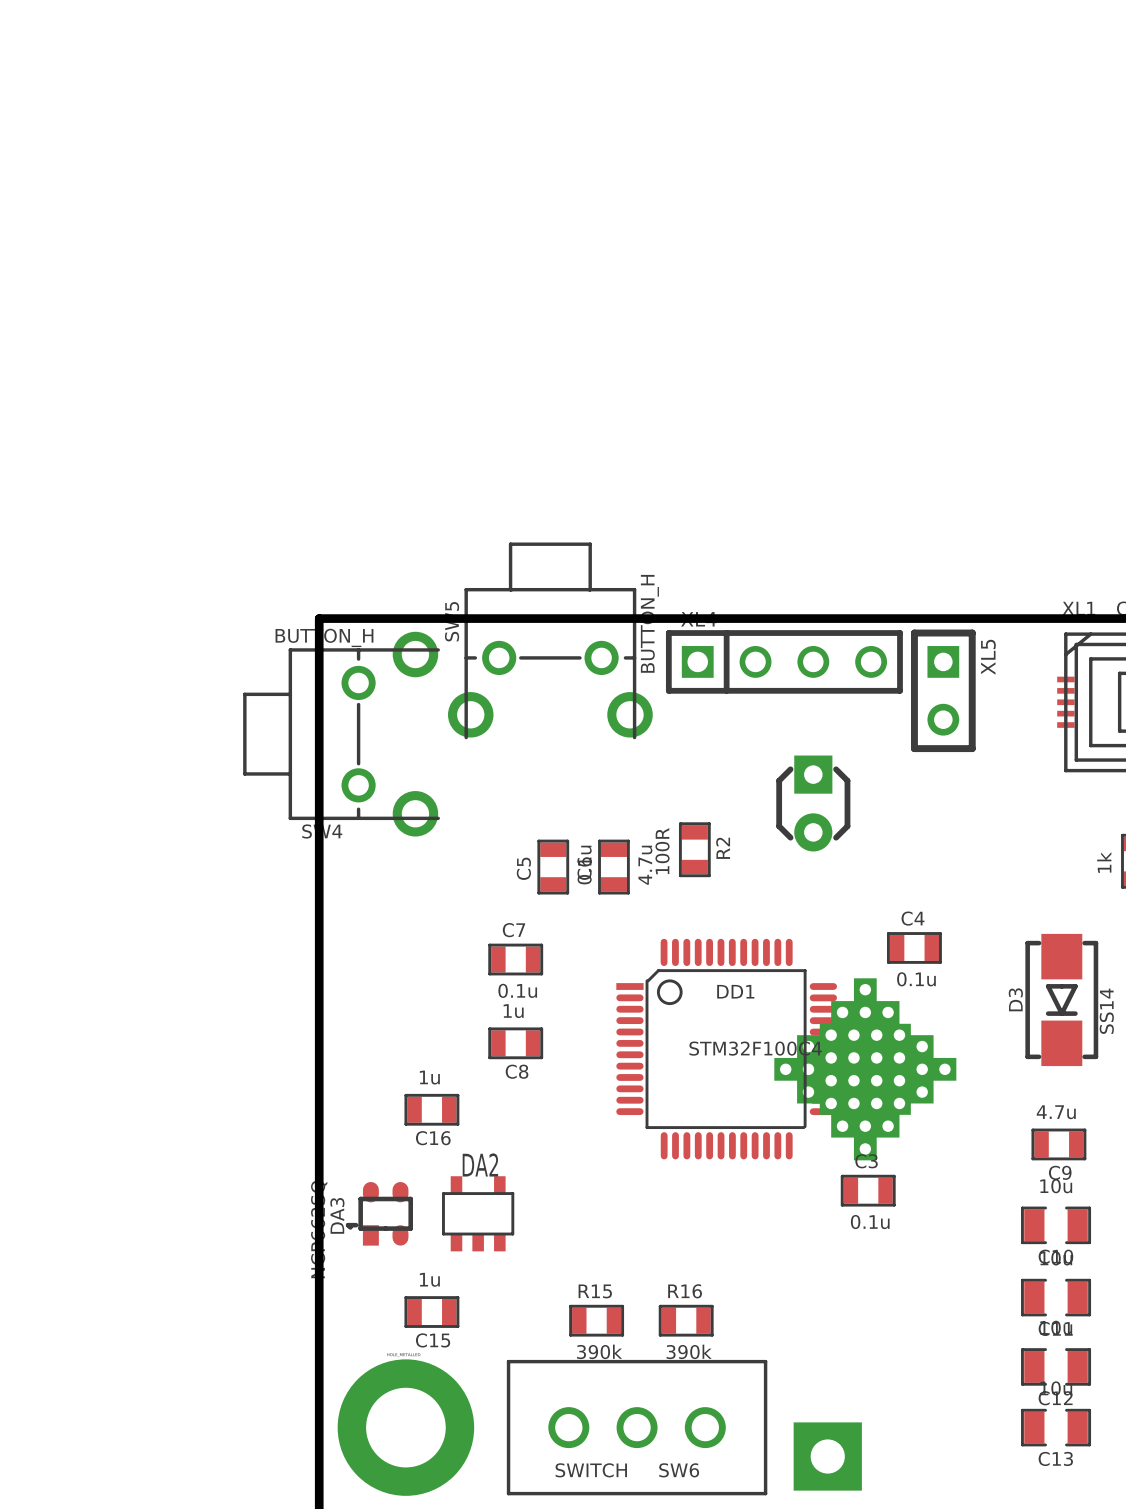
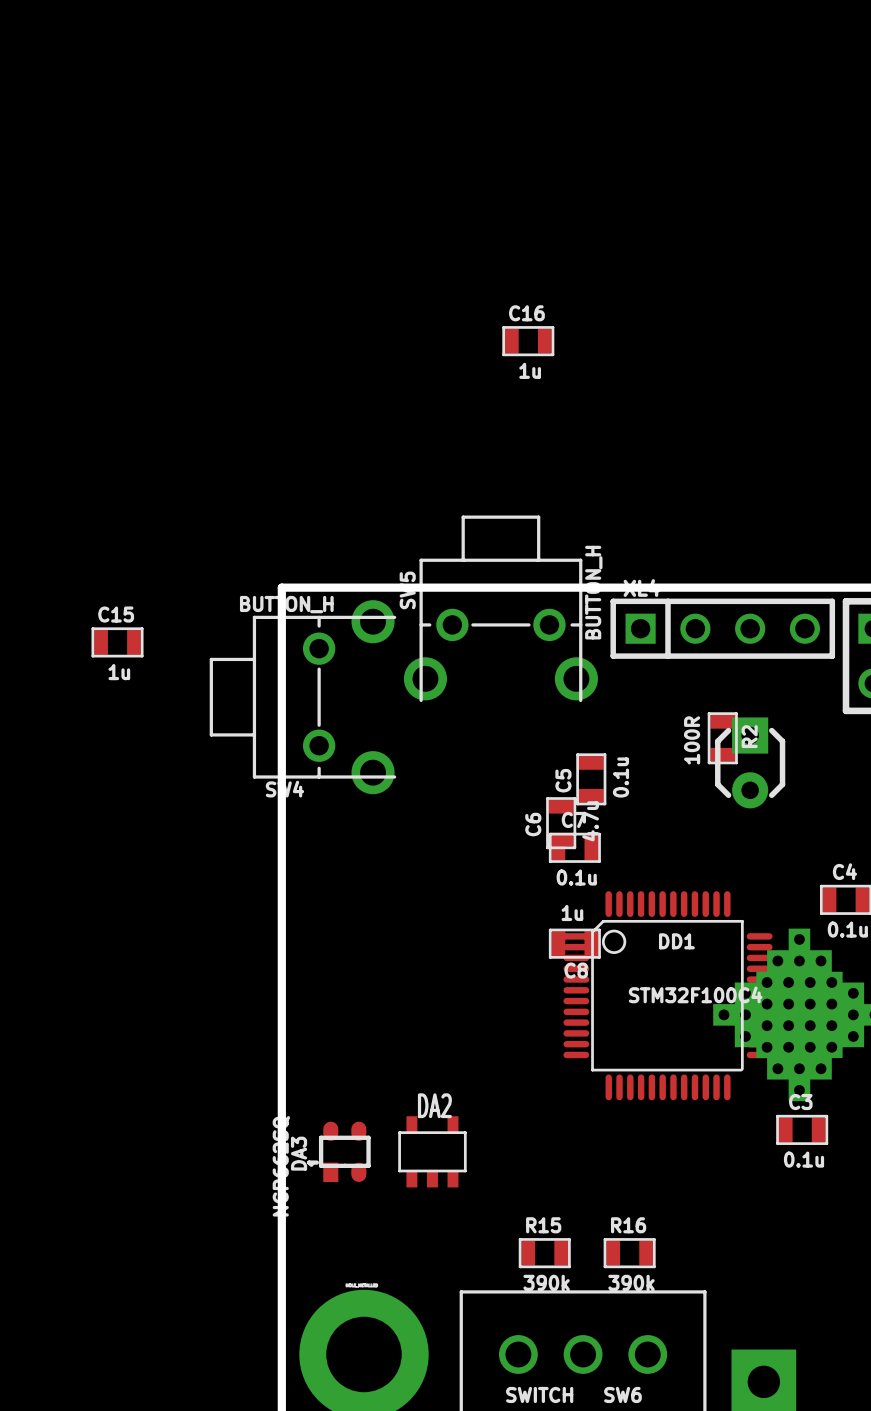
R2 position: (694, 849) -> (722, 738)
C5 position: (553, 867) -> (591, 779)
C7 position: (515, 959) -> (574, 847)
C8 position: (515, 1043) -> (574, 943)
C16 value position: 1u (429, 1077) -> 1u (530, 370)
C16 position: (431, 1109) -> (528, 341)
C16 name position: C16 (433, 1138) -> C16 (526, 313)
C15 value position: 1u (429, 1279) -> 1u (119, 672)
C15 position: (431, 1312) -> (117, 642)
C15 name position: C15 (433, 1340) -> C15 (116, 614)

